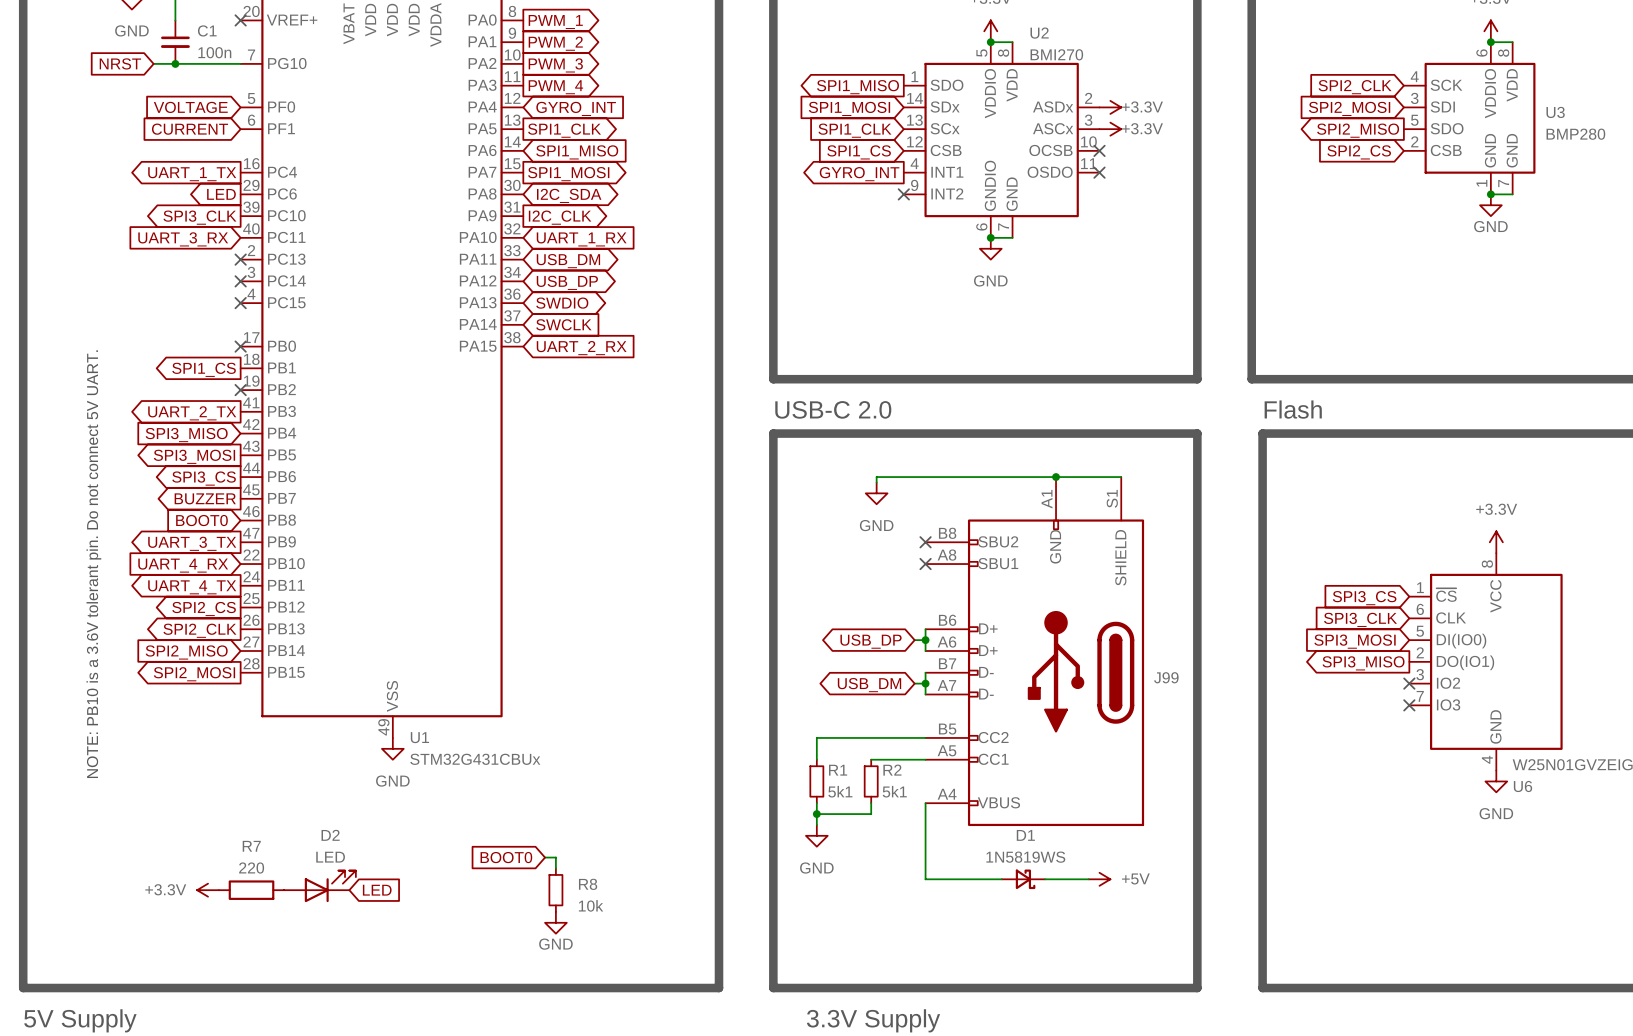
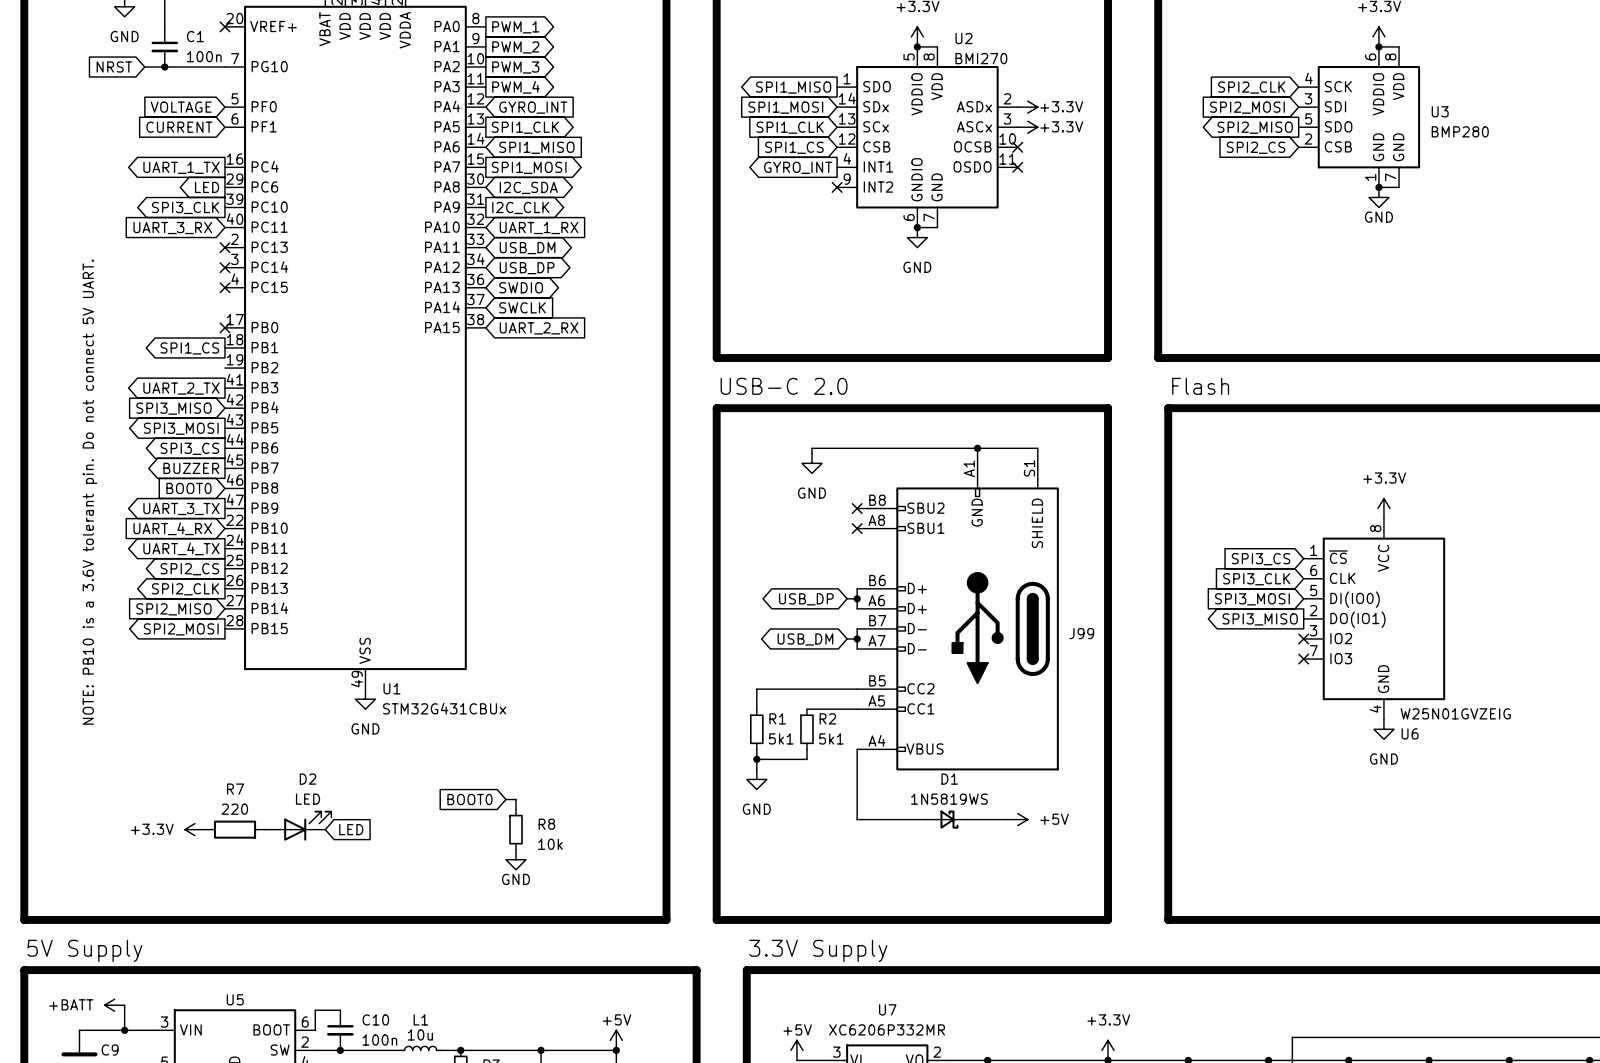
no-connect mark: (240, 390) -> none

